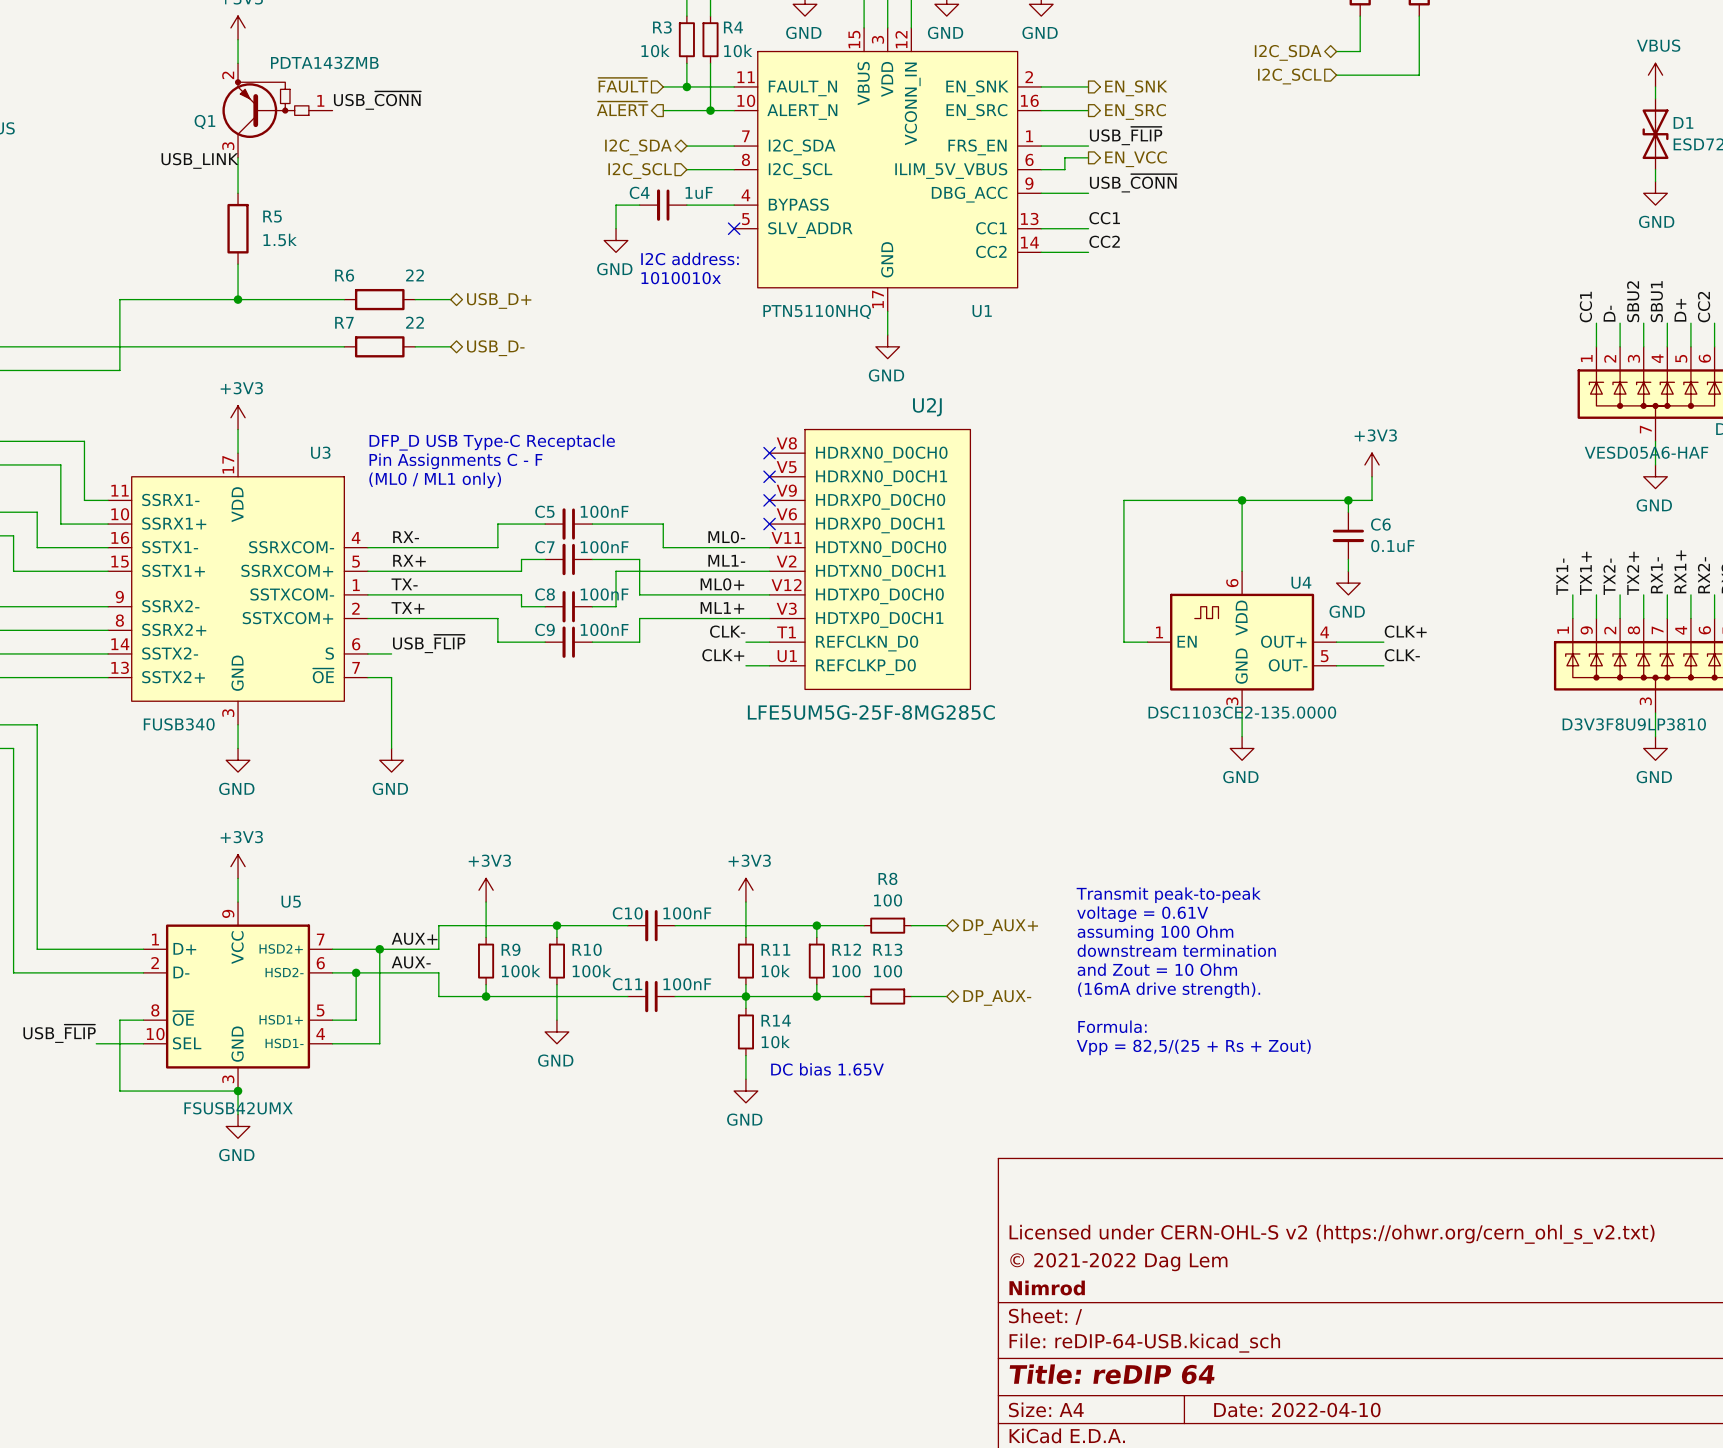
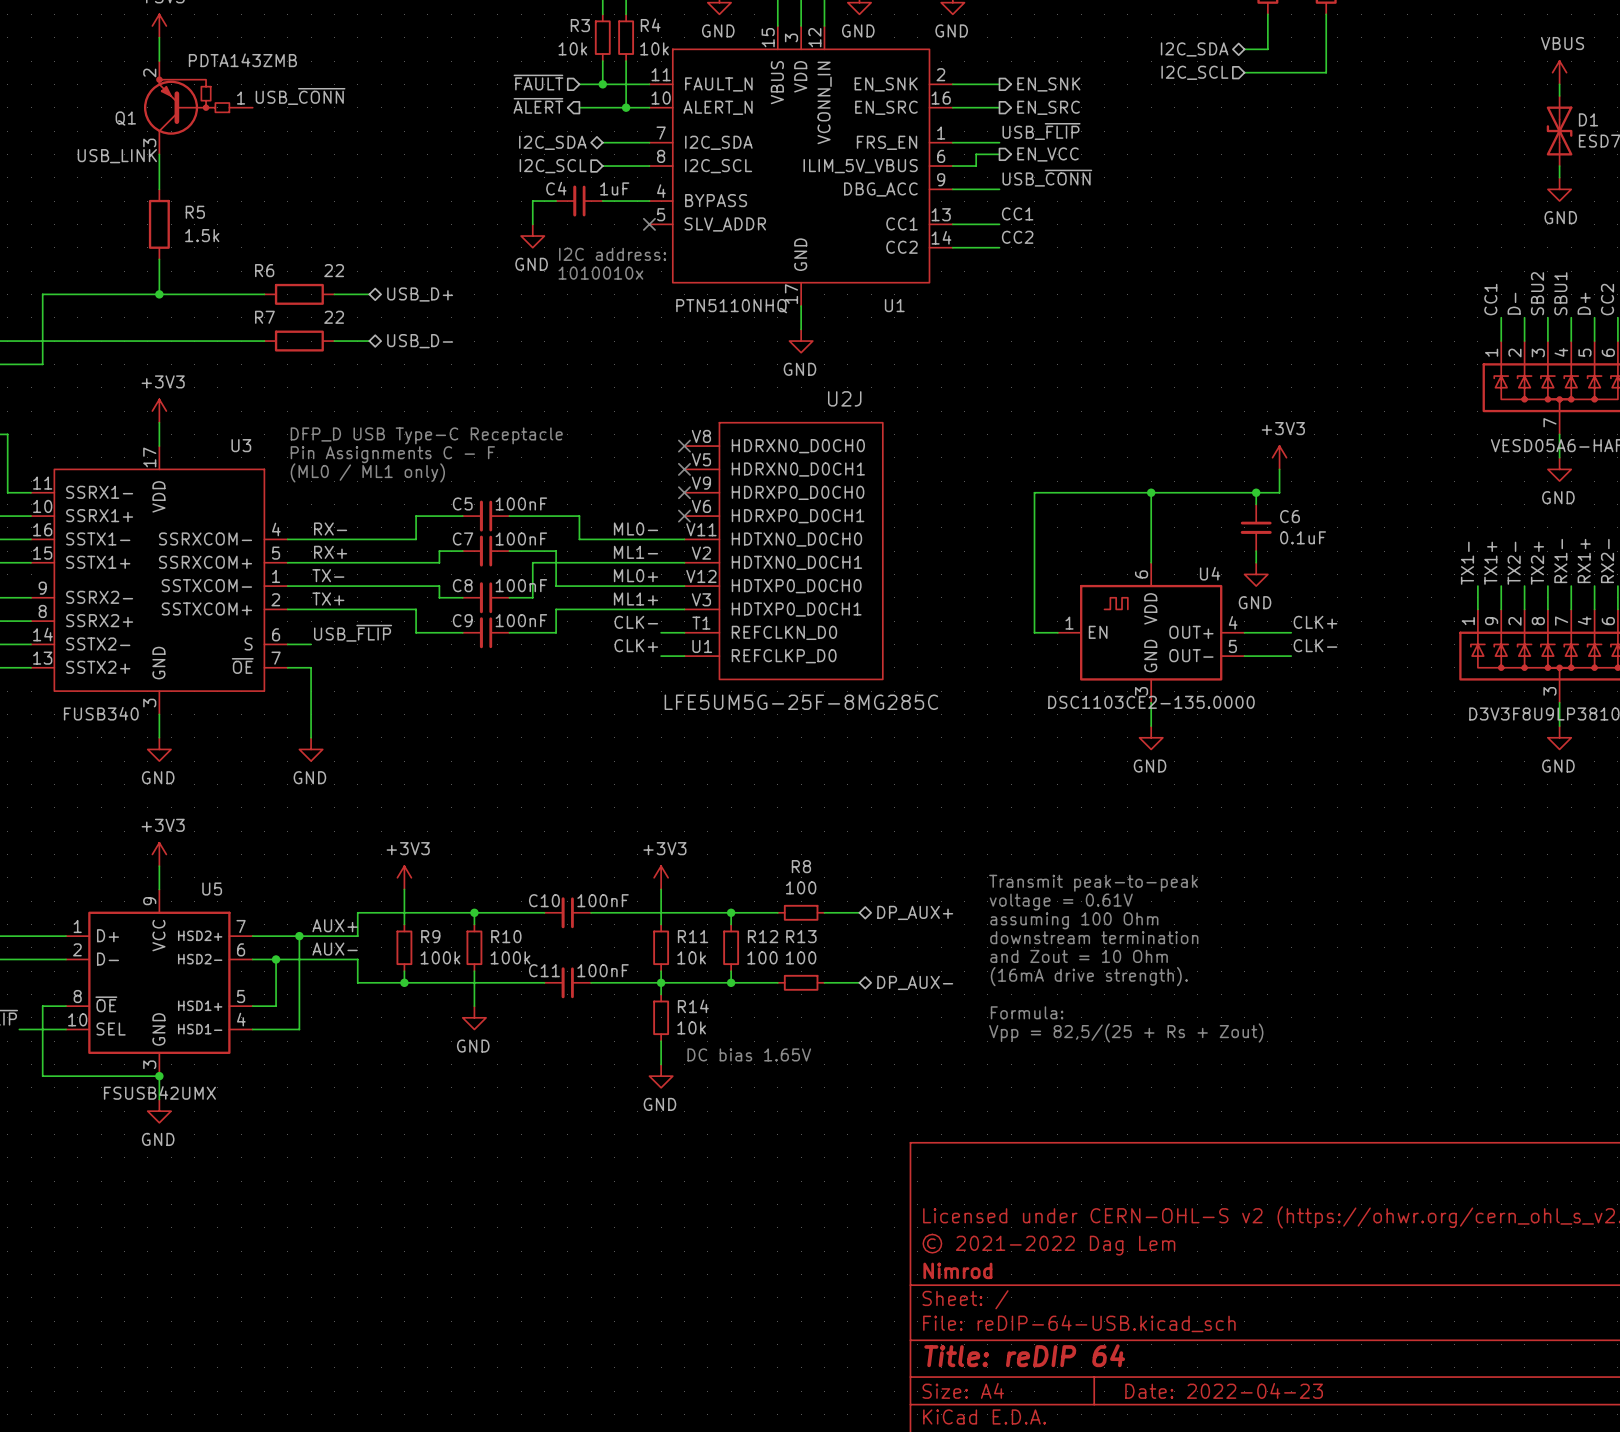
title block: Date: 2022-04-10 (1297, 1410) -> Date: 2022-04-23 (1224, 1390)

